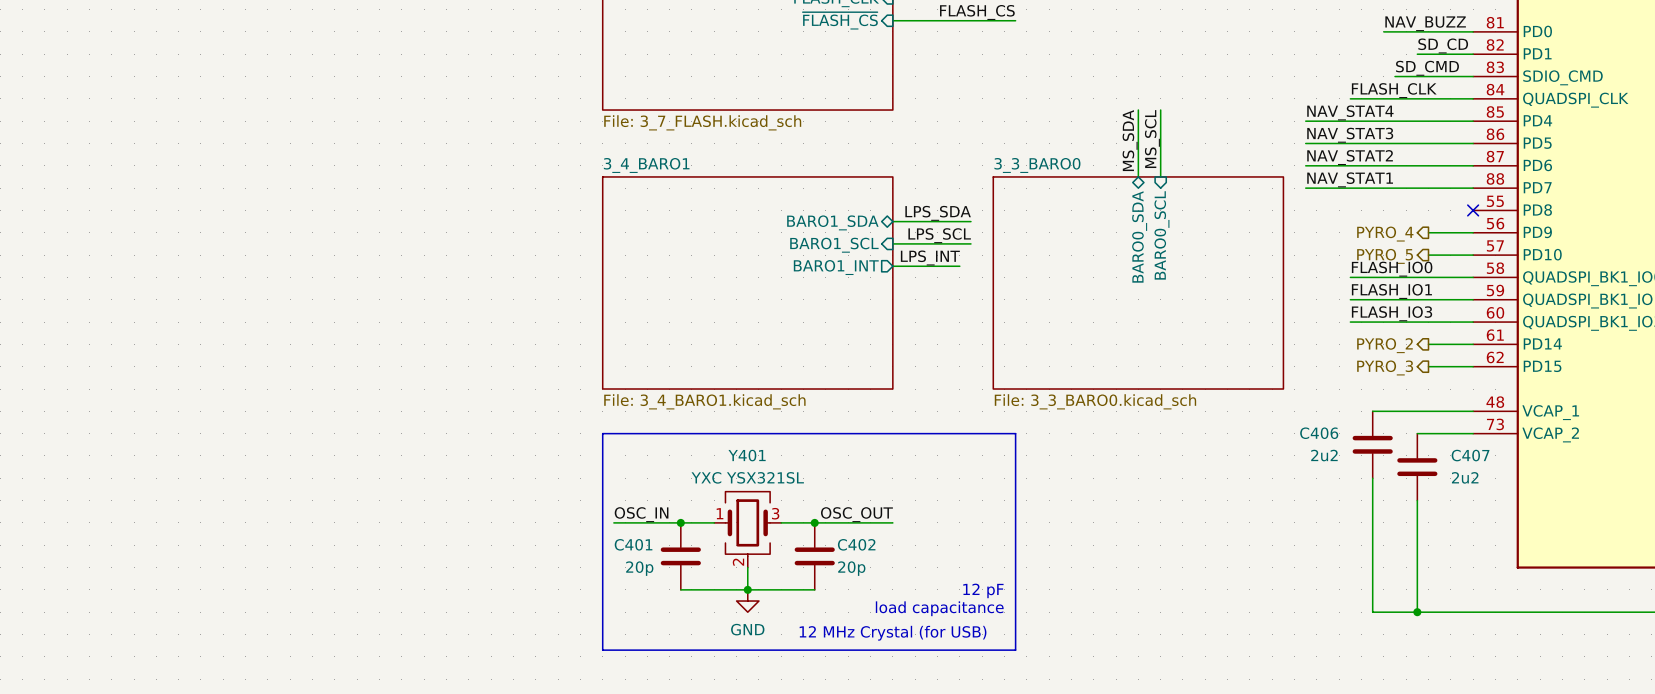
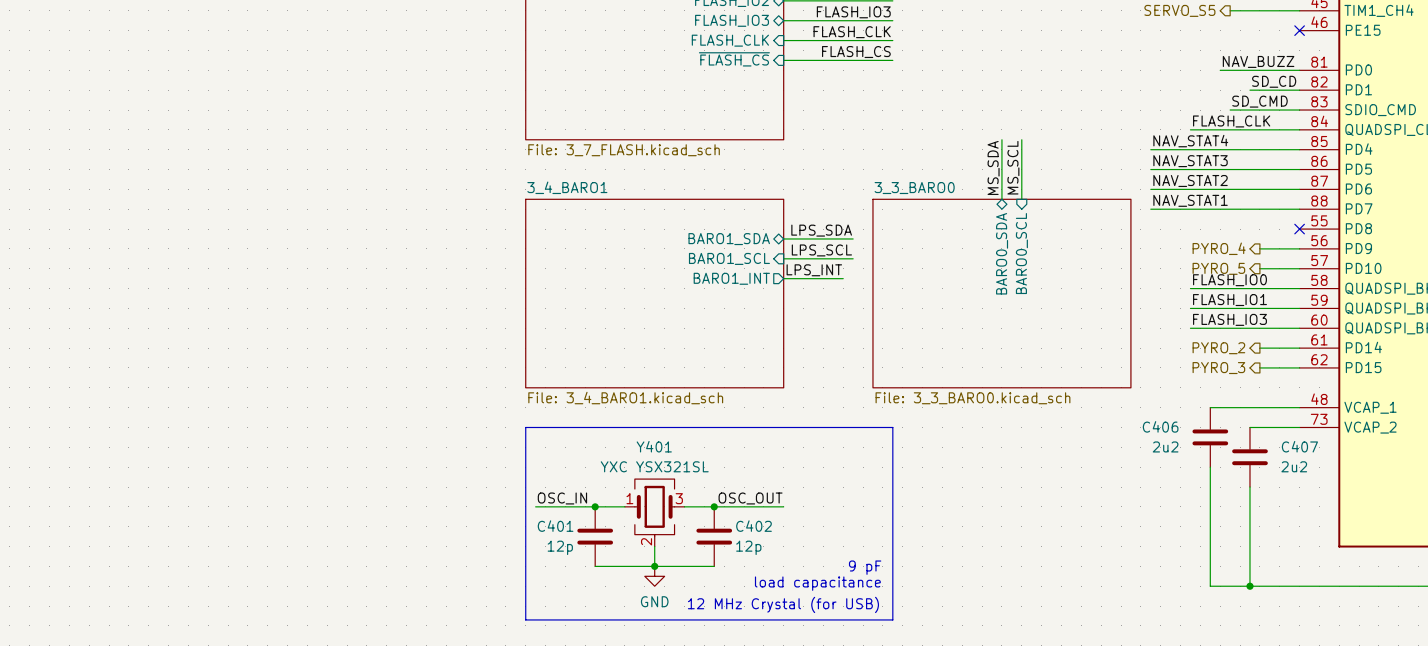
C401 value: 20p (639, 568) -> 12p (560, 547)
C402 value: 20p (851, 568) -> 12p (748, 547)
text: 12 pF (983, 590) -> 9 pF (865, 567)

